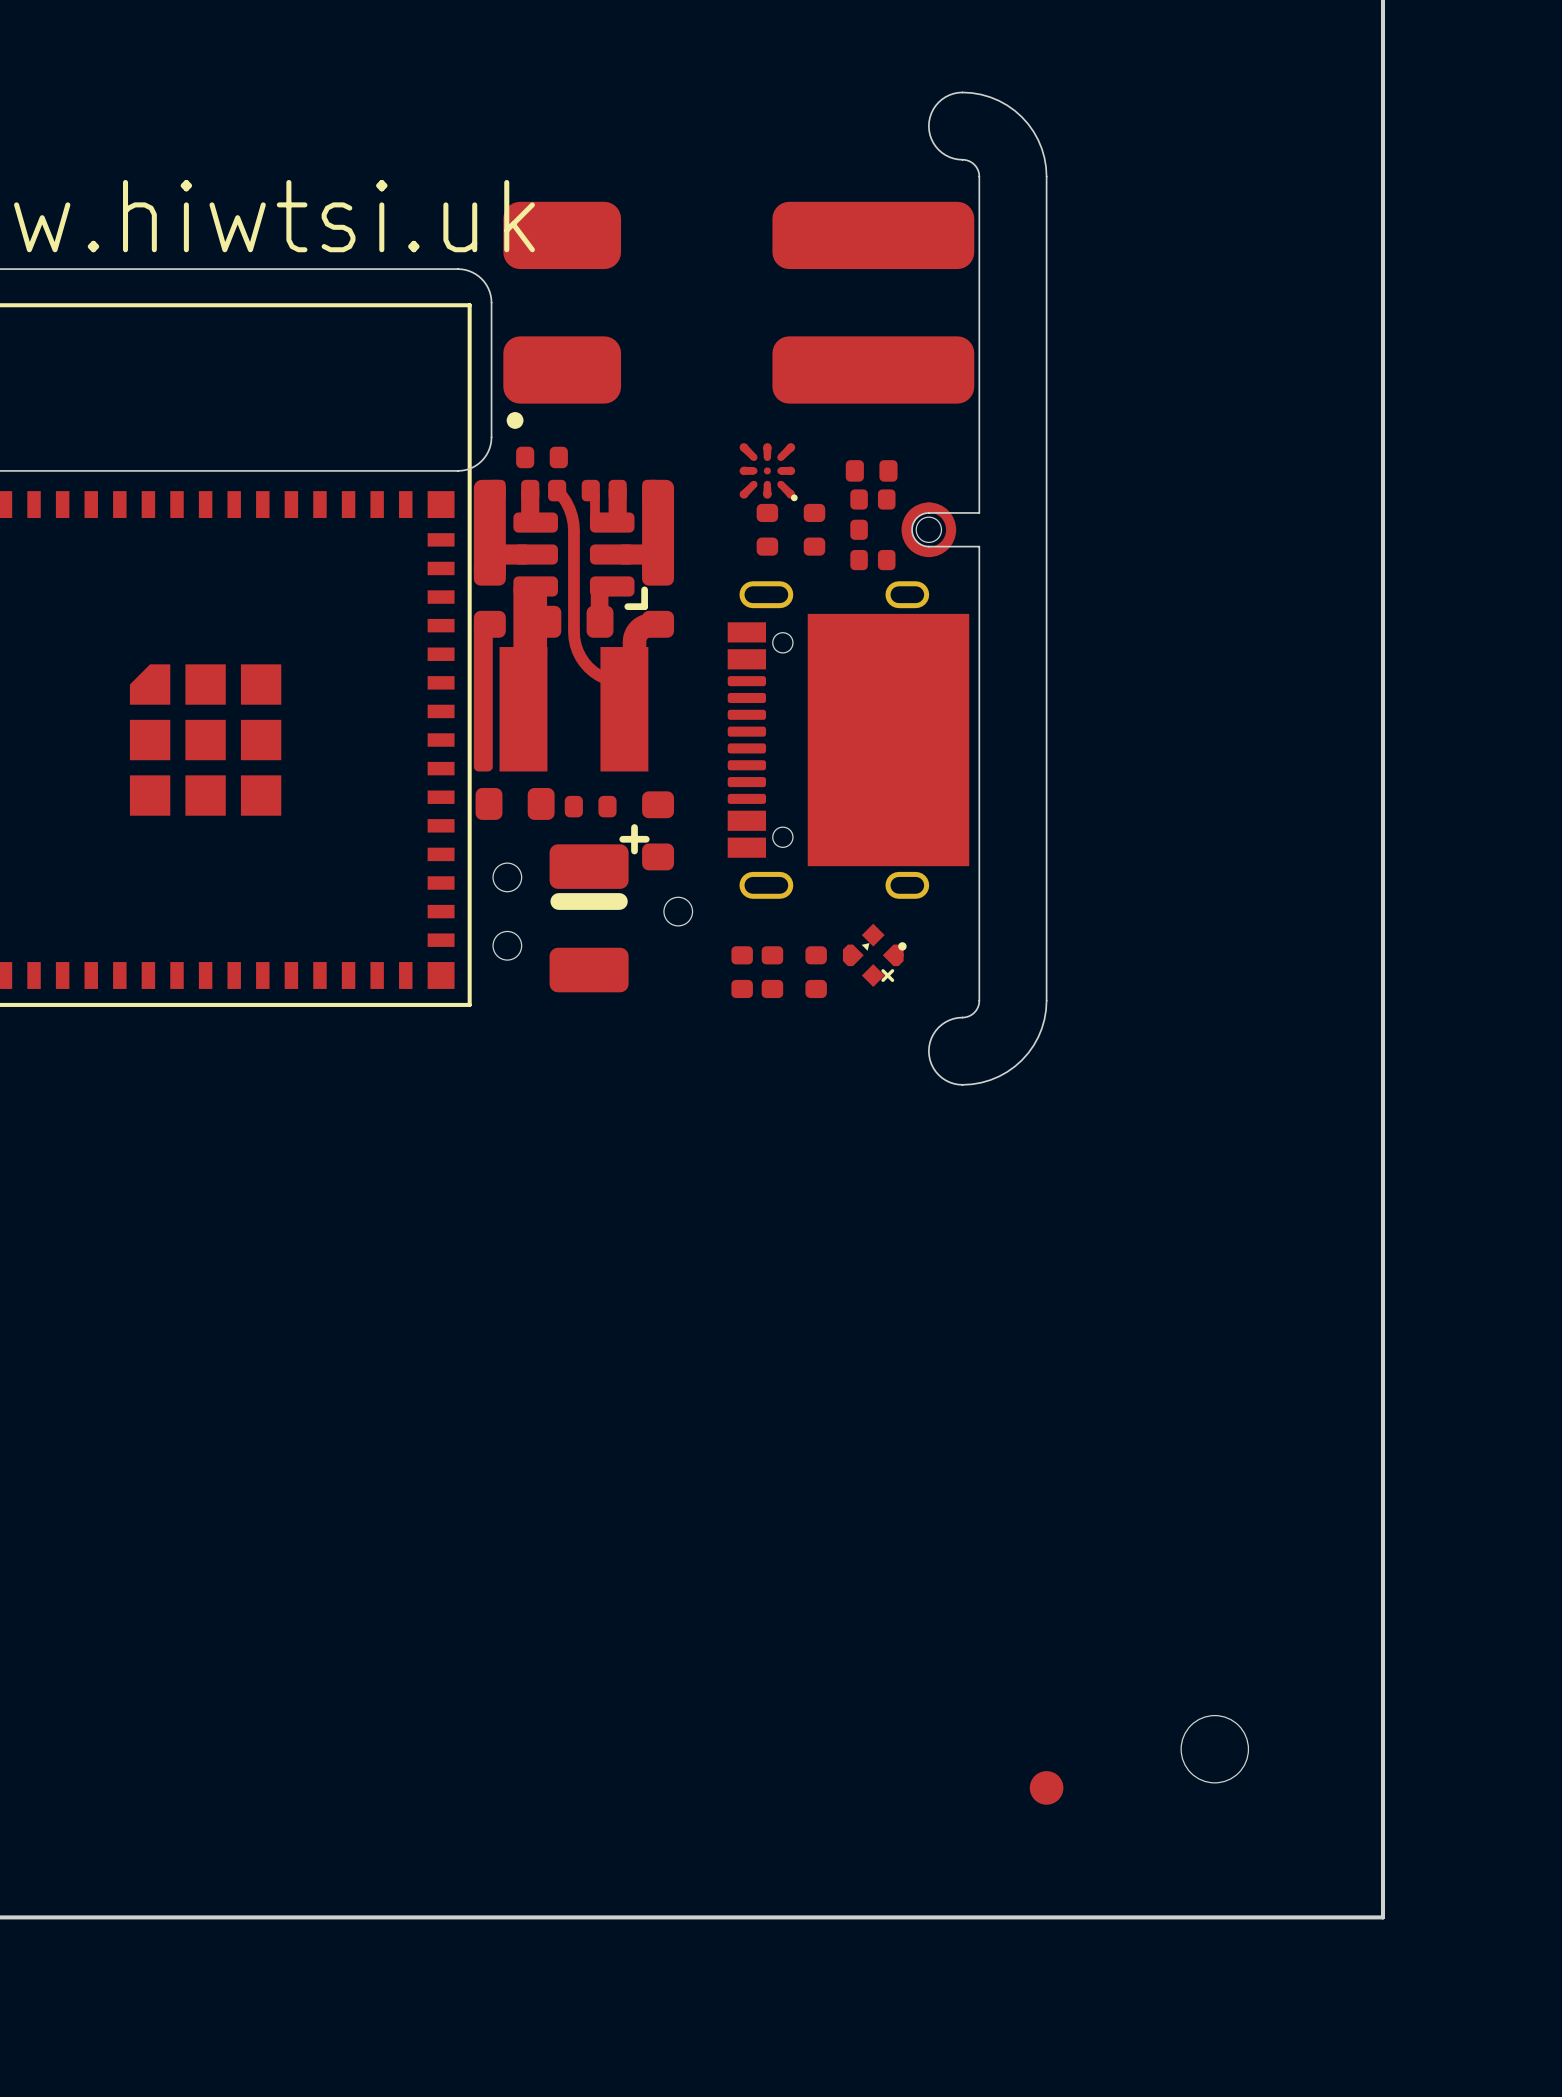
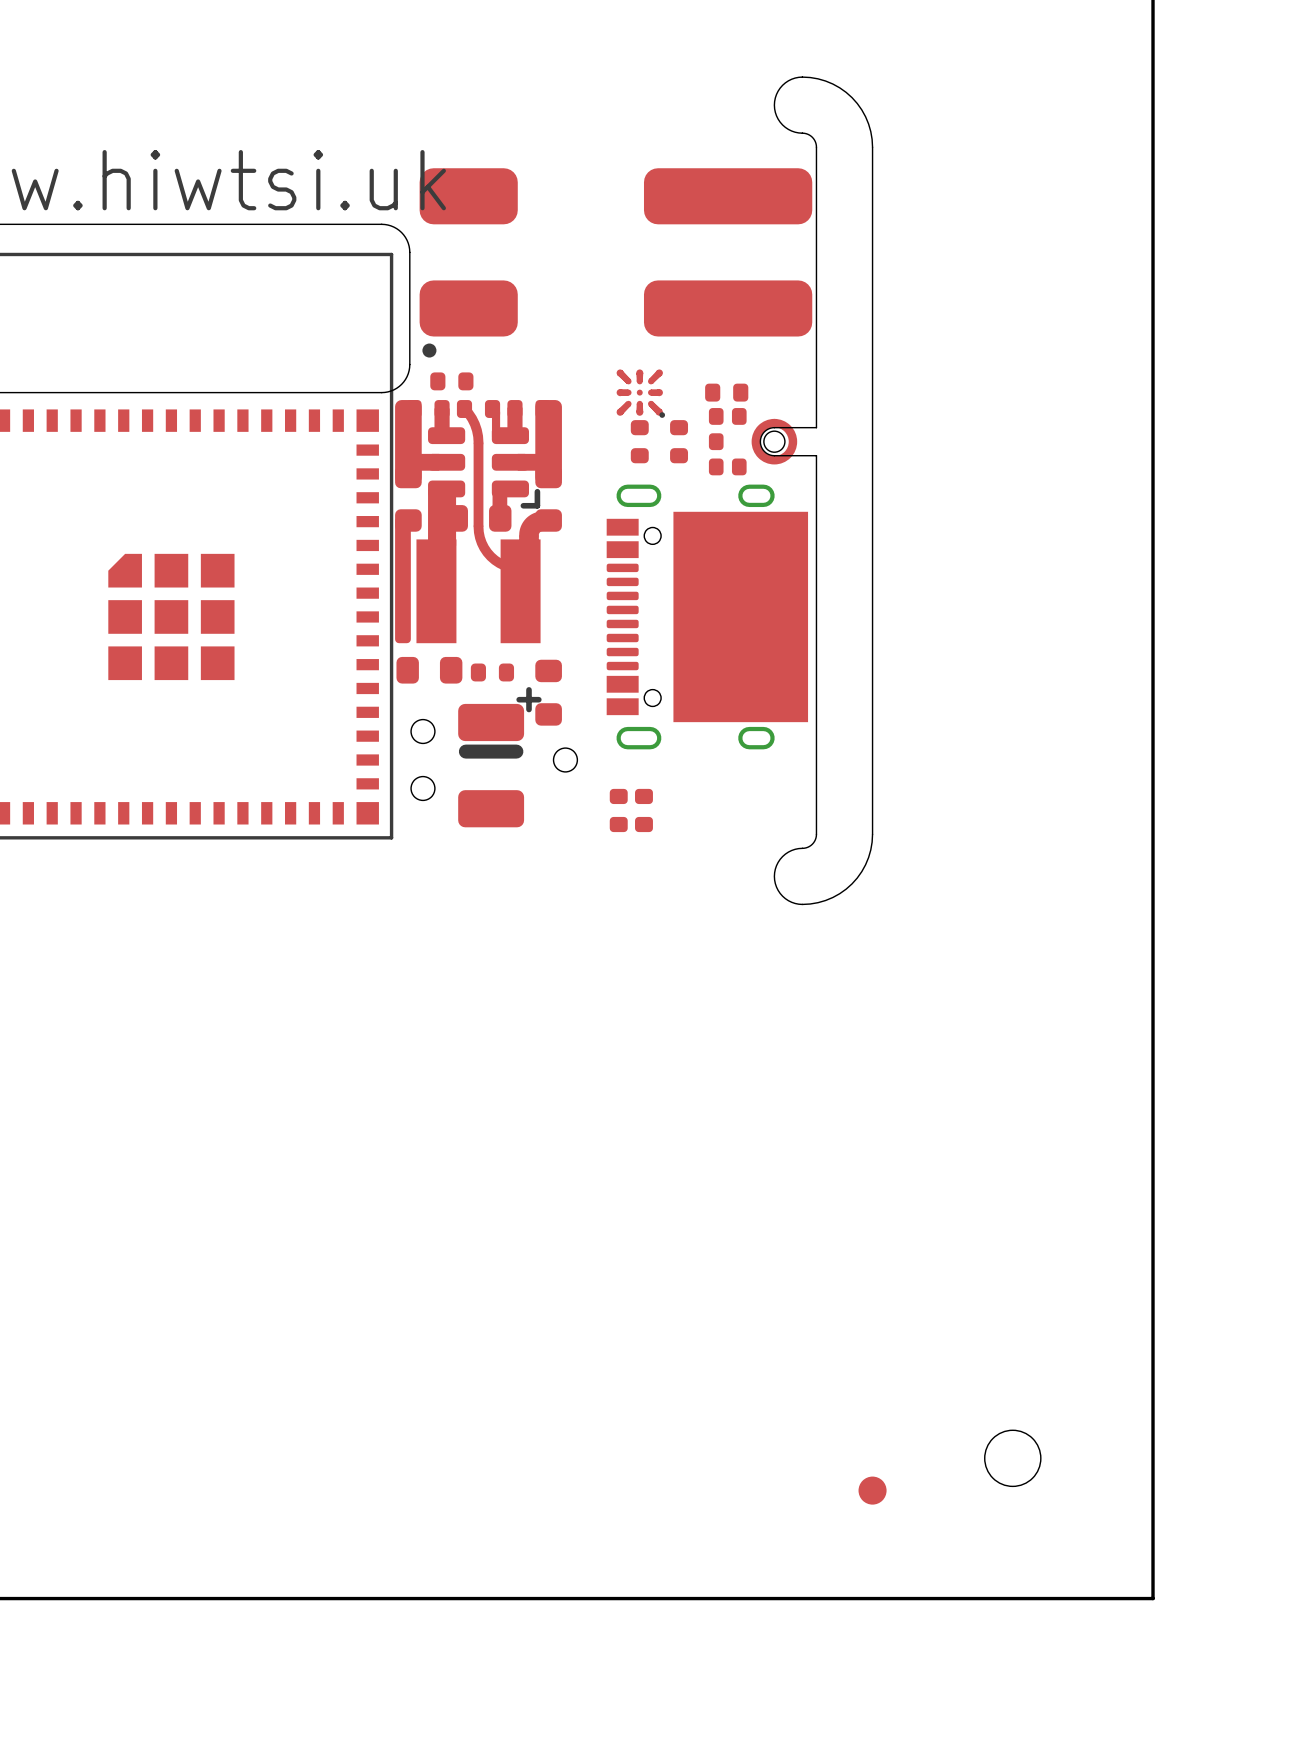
part: (874, 955) -> none
part: (816, 972) -> none

